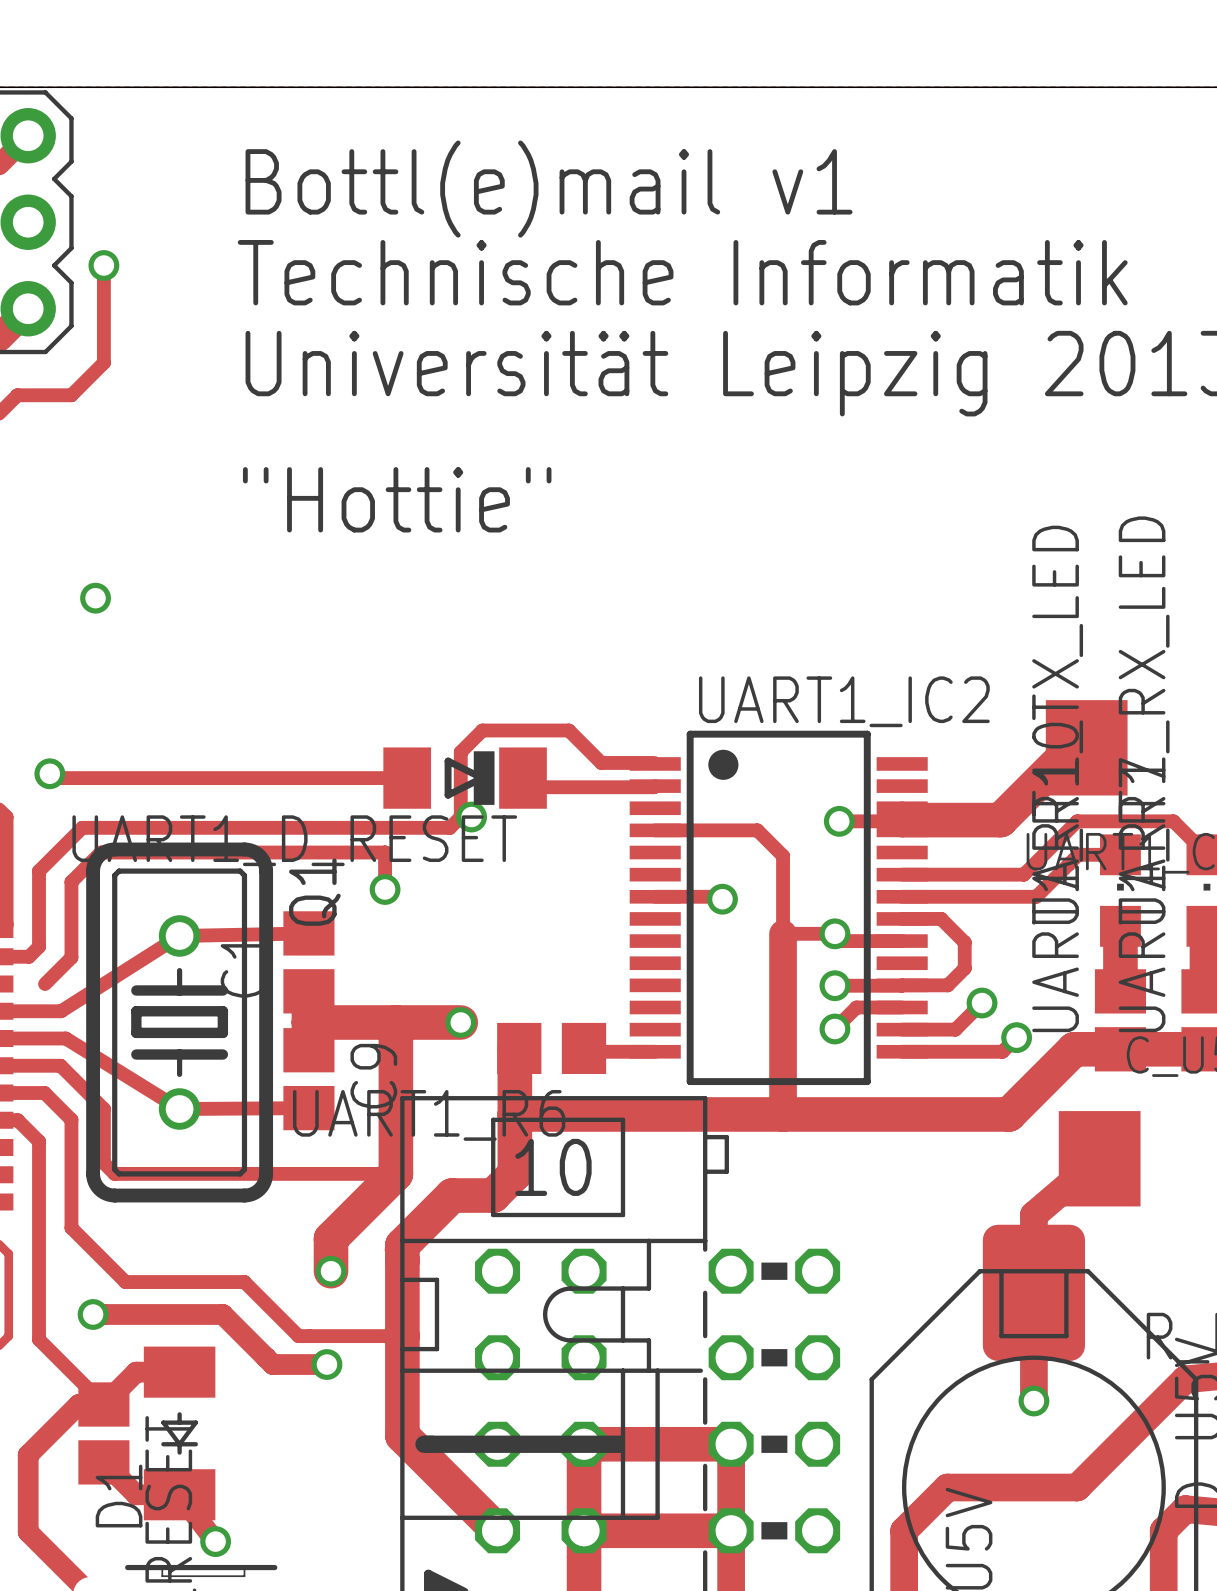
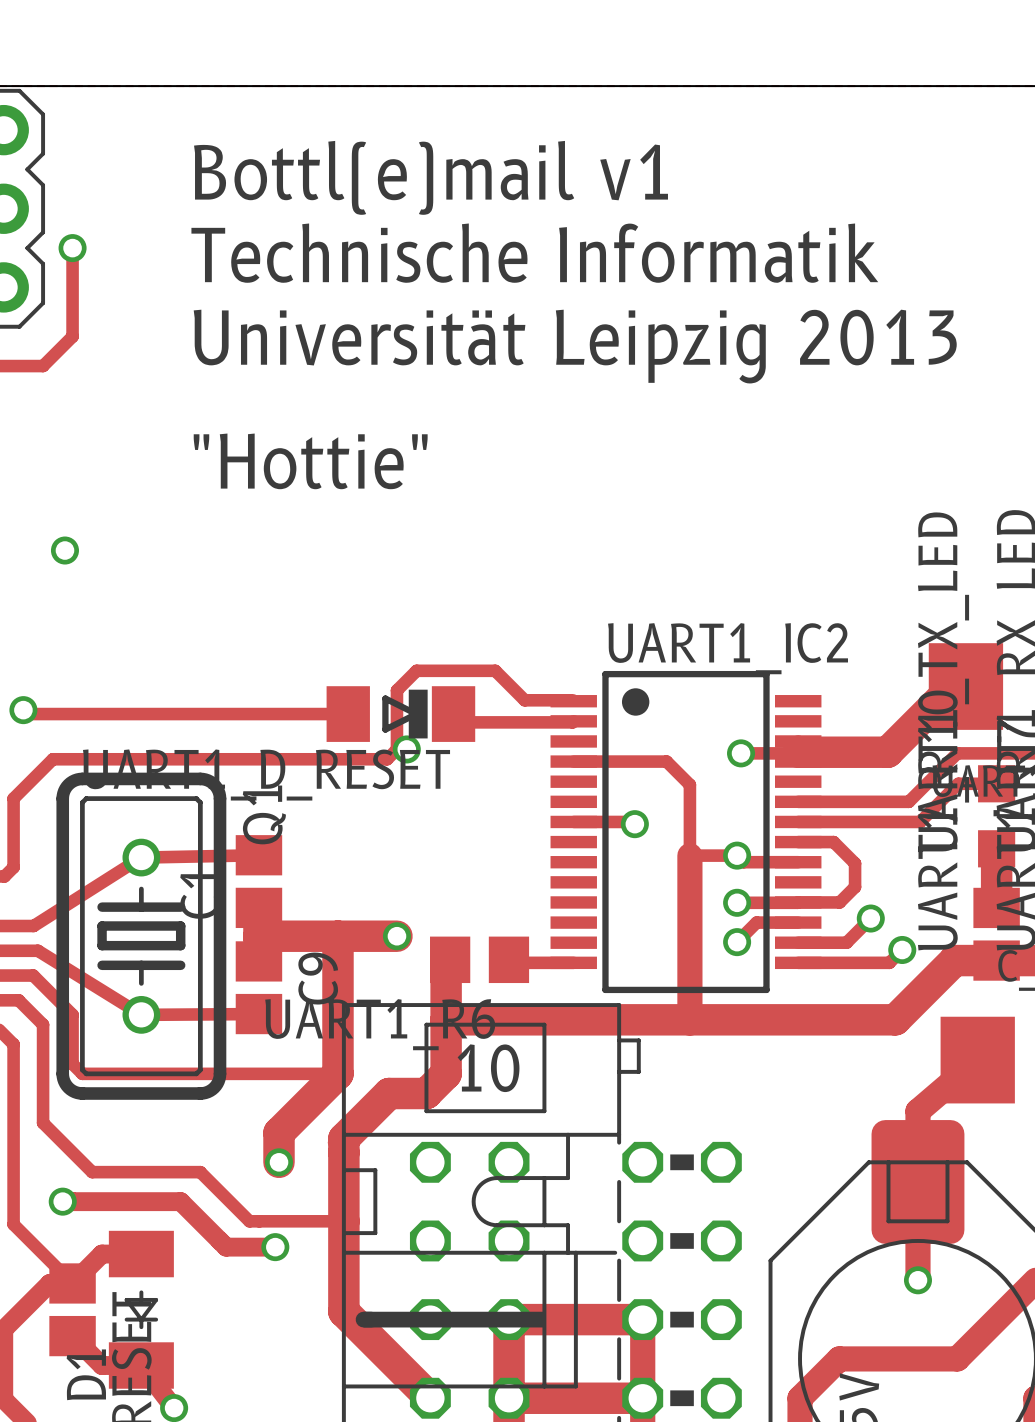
track: (385, 889) (385, 852) (100, 852) (71, 881) (71, 957) (45, 984) -> none
via: (385, 889) -> none

